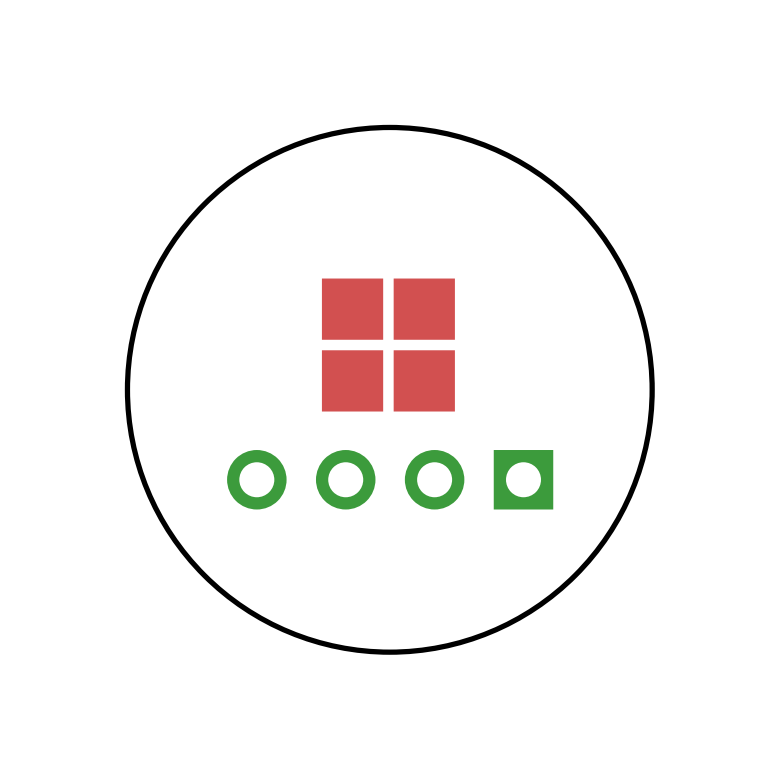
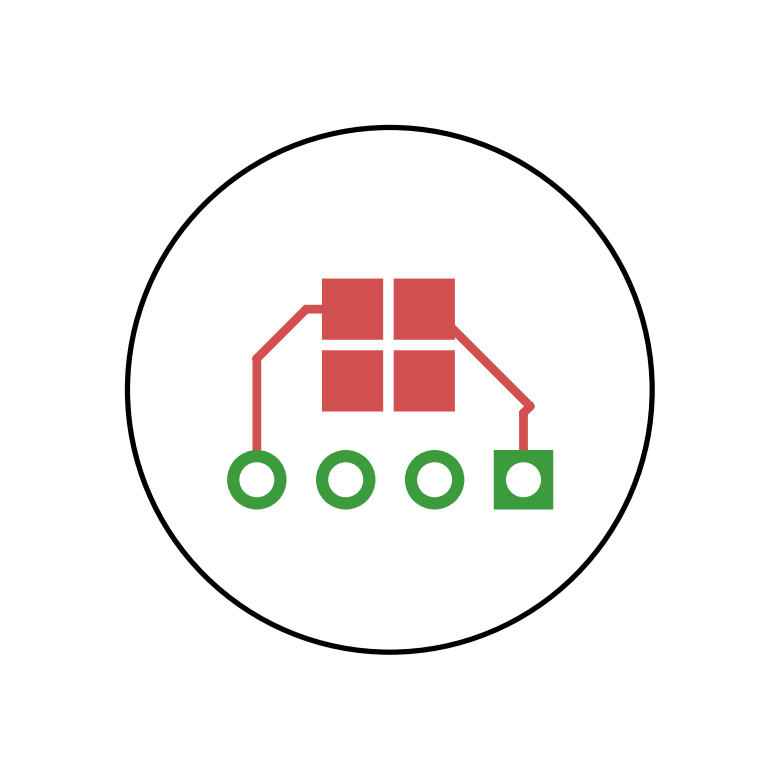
top track: none -> (352, 309) (306, 309) (256, 358) (256, 479)
top track: none -> (424, 309) (433, 309) (530, 406) (523, 412) (523, 479)

